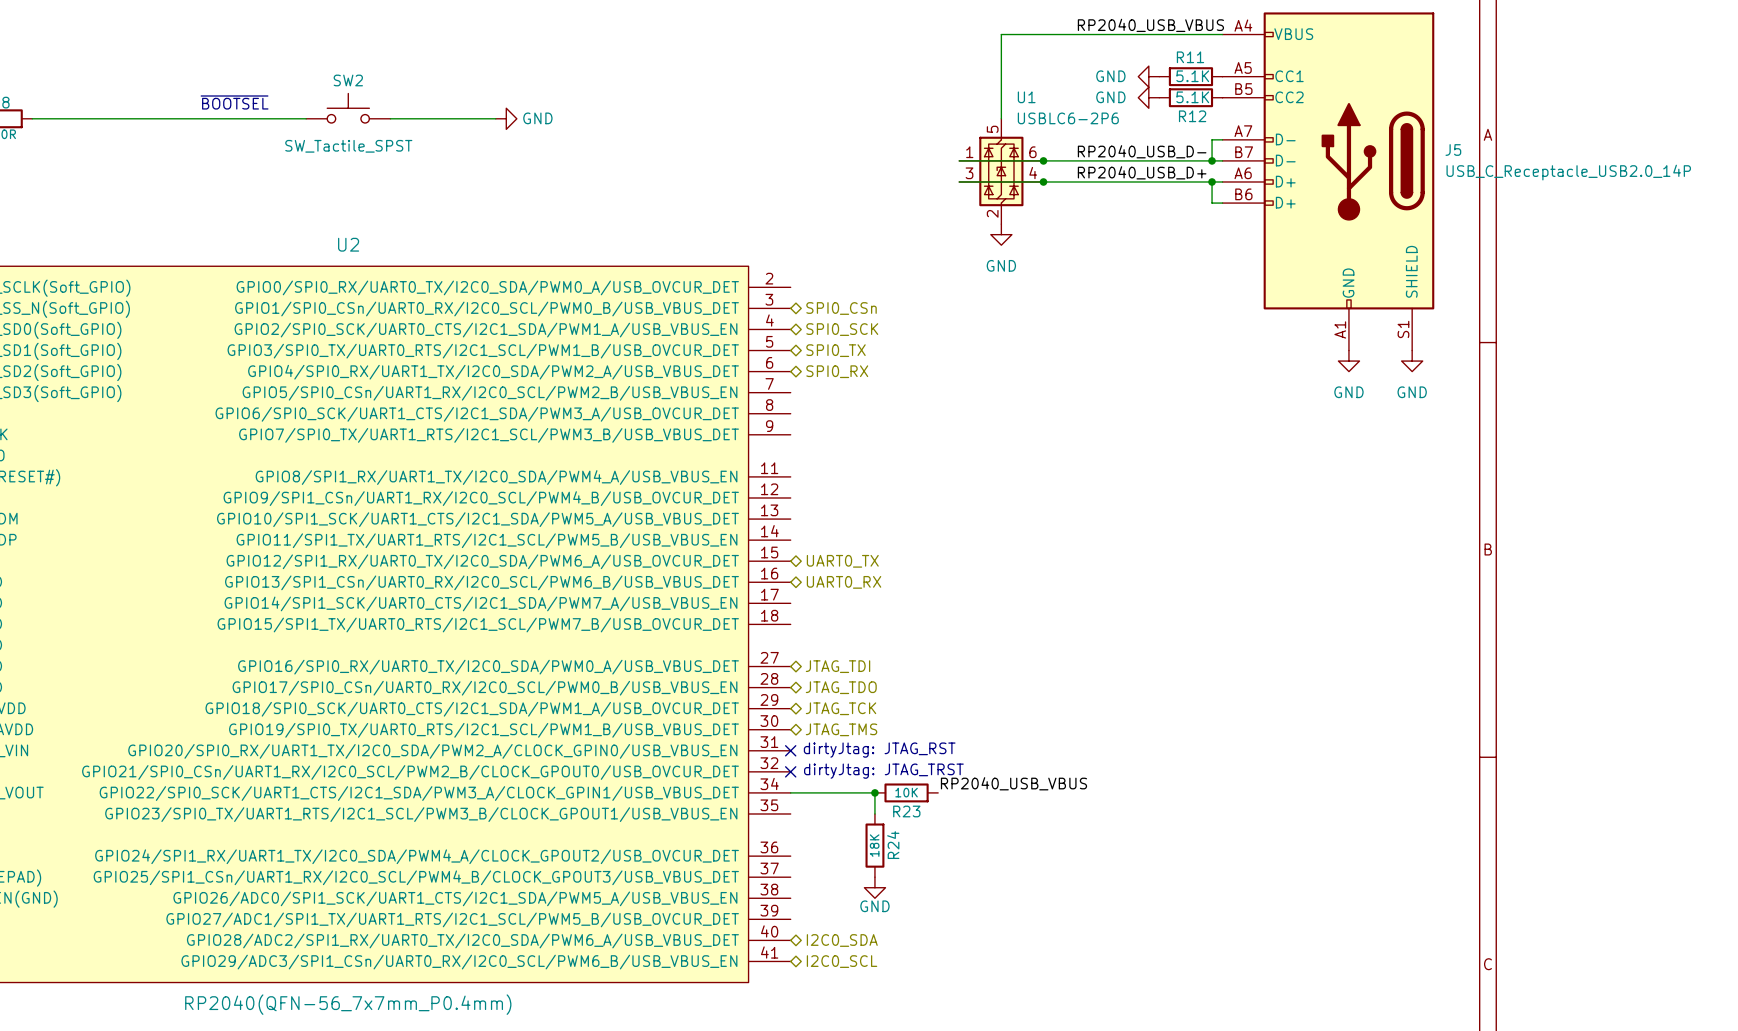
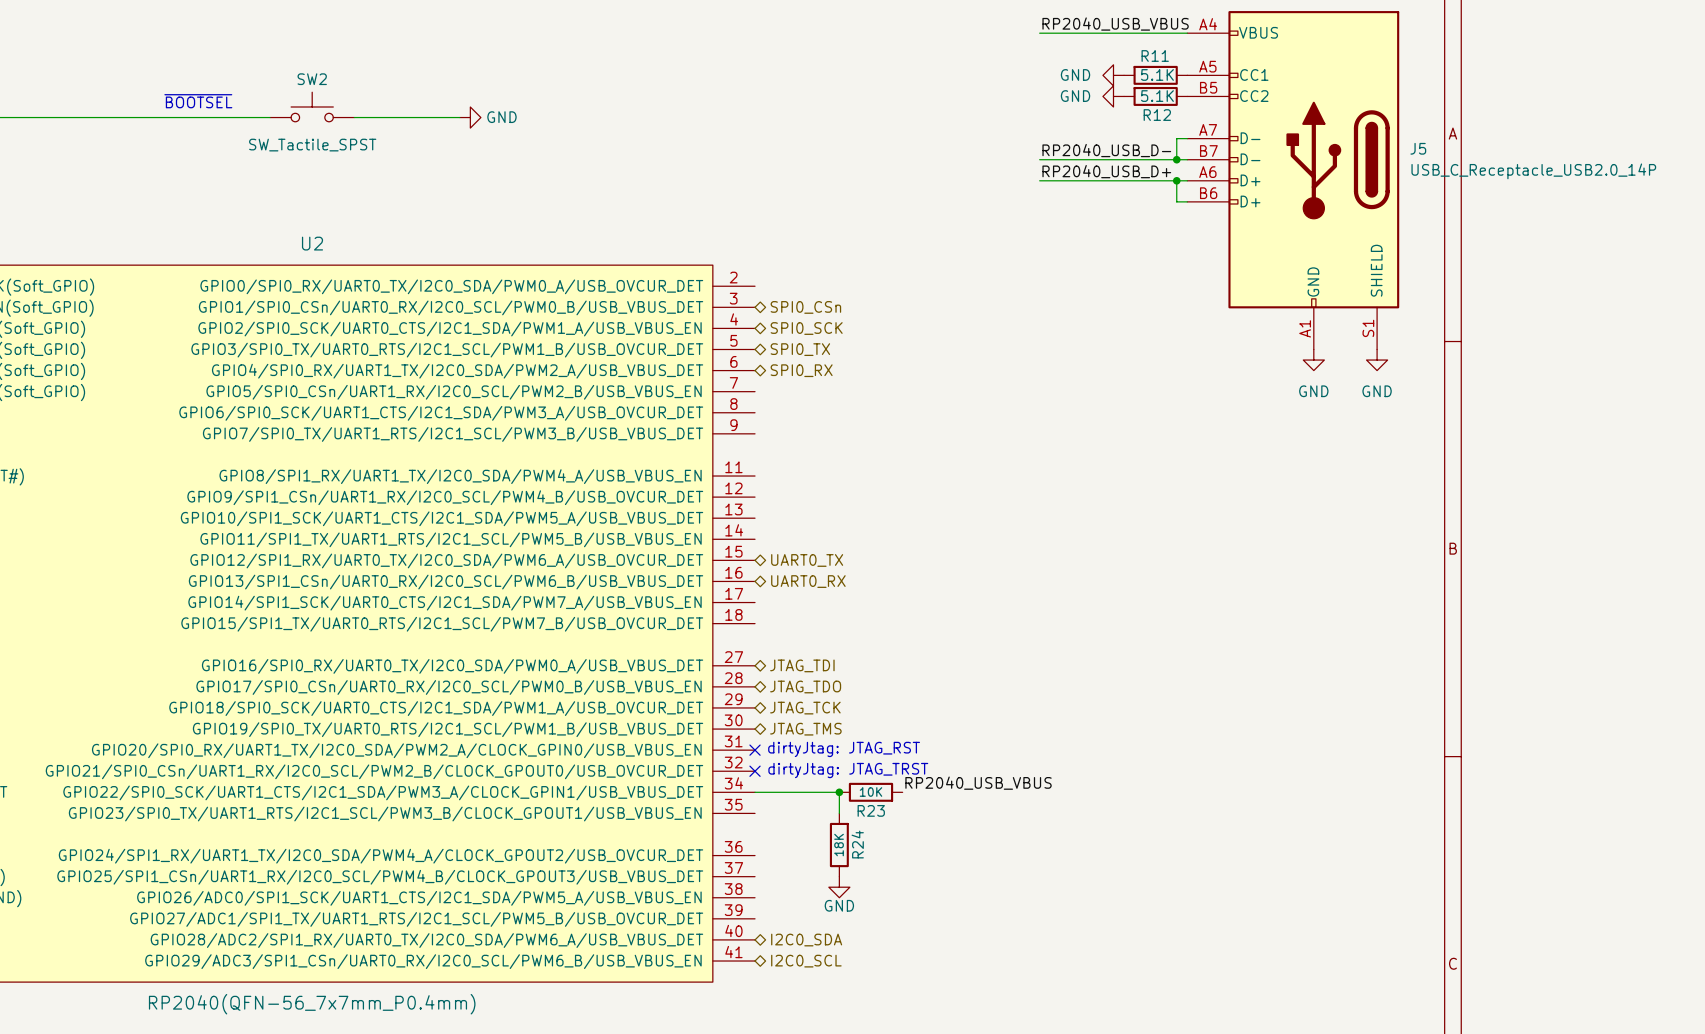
wire: (1075, 34) (1001, 34) (1001, 118) -> none
wire: (959, 160) (1075, 160) -> none
junction: (1043, 160) -> none
U1: USBLC6-2P6 (1001, 171) -> none
wire: (959, 181) (1075, 181) -> none
junction: (1043, 181) -> none
power symbol: GND (1001, 234) -> none

